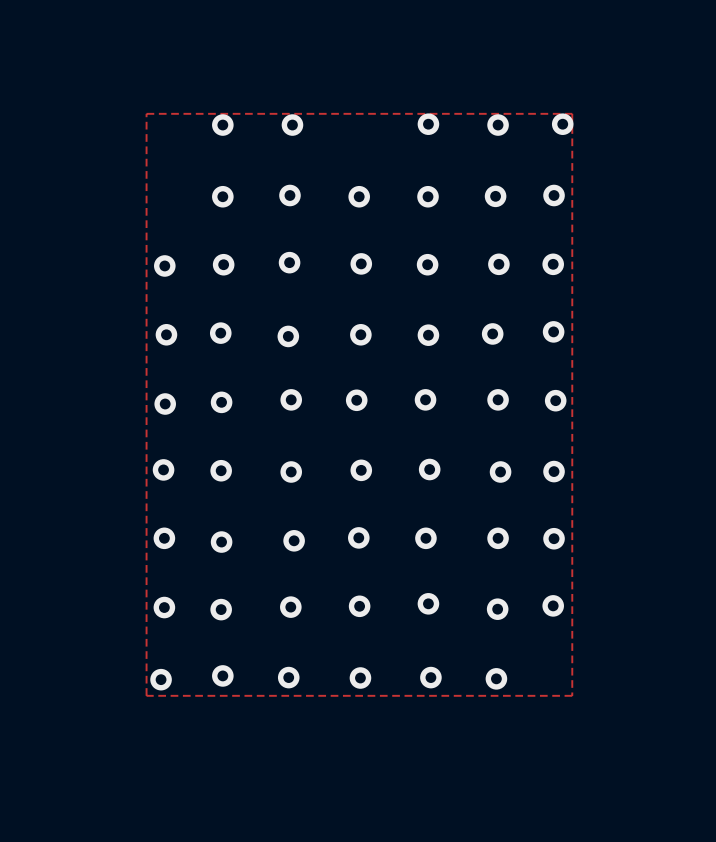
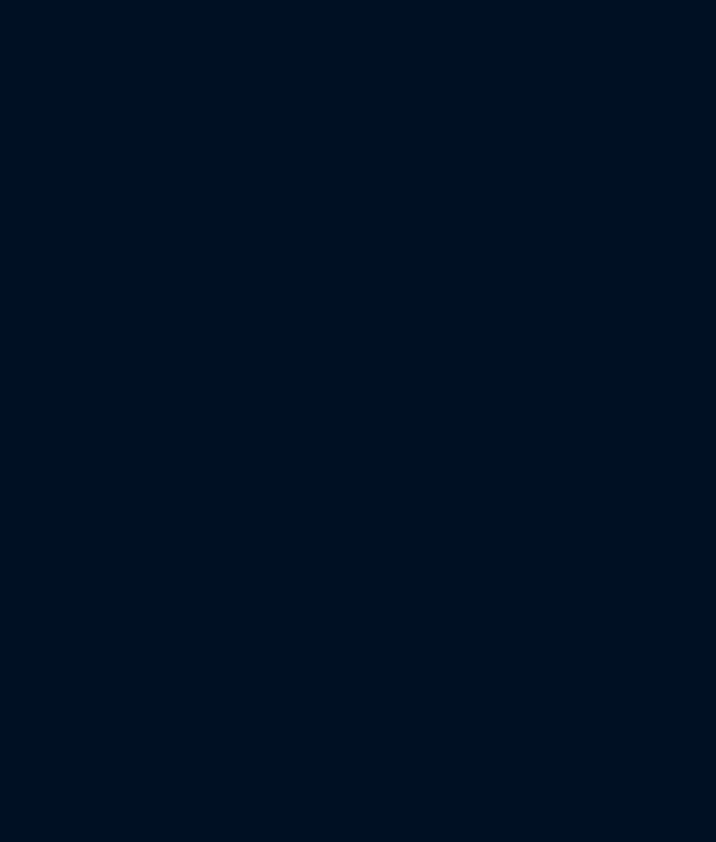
top zone outline: (146, 113) (572, 113) (572, 695) (146, 695) (146, 113) -> none
via: (428, 124) -> none
via: (562, 124) -> none
via: (222, 125) -> none
via: (292, 125) -> none
via: (498, 125) -> none
via: (289, 195) -> none
via: (554, 195) -> none
via: (222, 196) -> none
via: (359, 196) -> none
via: (428, 196) -> none
via: (495, 196) -> none
via: (289, 262) -> none
via: (361, 263) -> none
via: (223, 264) -> none
via: (427, 264) -> none
via: (498, 264) -> none
via: (553, 264) -> none
via: (164, 265) -> none
via: (553, 331) -> none
via: (220, 333) -> none
via: (492, 333) -> none
via: (166, 334) -> none
via: (360, 334) -> none
via: (428, 335) -> none
via: (288, 336) -> none
via: (291, 399) -> none
via: (425, 399) -> none
via: (498, 399) -> none
via: (356, 400) -> none
via: (555, 400) -> none
via: (221, 402) -> none
via: (165, 404) -> none
via: (163, 469) -> none
via: (429, 469) -> none
via: (221, 470) -> none
via: (361, 470) -> none
via: (291, 471) -> none
via: (500, 471) -> none
via: (554, 471) -> none
via: (358, 537) -> none
via: (164, 538) -> none
via: (425, 538) -> none
via: (498, 538) -> none
via: (554, 538) -> none
via: (294, 540) -> none
via: (221, 542) -> none
via: (428, 603) -> none
via: (553, 605) -> none
via: (359, 606) -> none
via: (164, 607) -> none
via: (290, 607) -> none
via: (221, 609) -> none
via: (497, 609) -> none
via: (222, 675) -> none
via: (288, 677) -> none
via: (430, 677) -> none
via: (360, 678) -> none
via: (496, 678) -> none
via: (161, 679) -> none

